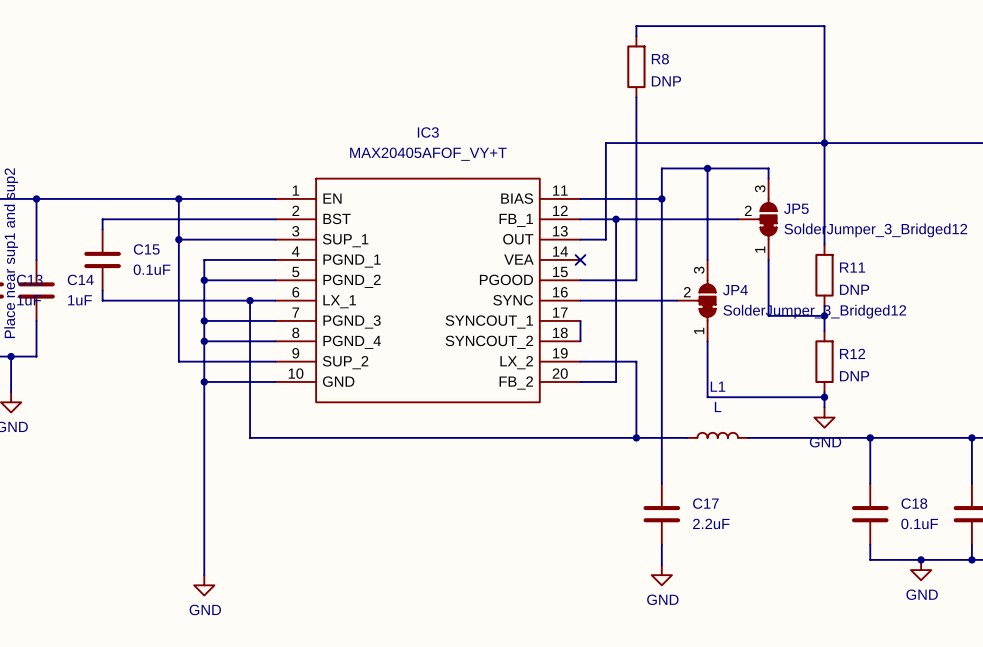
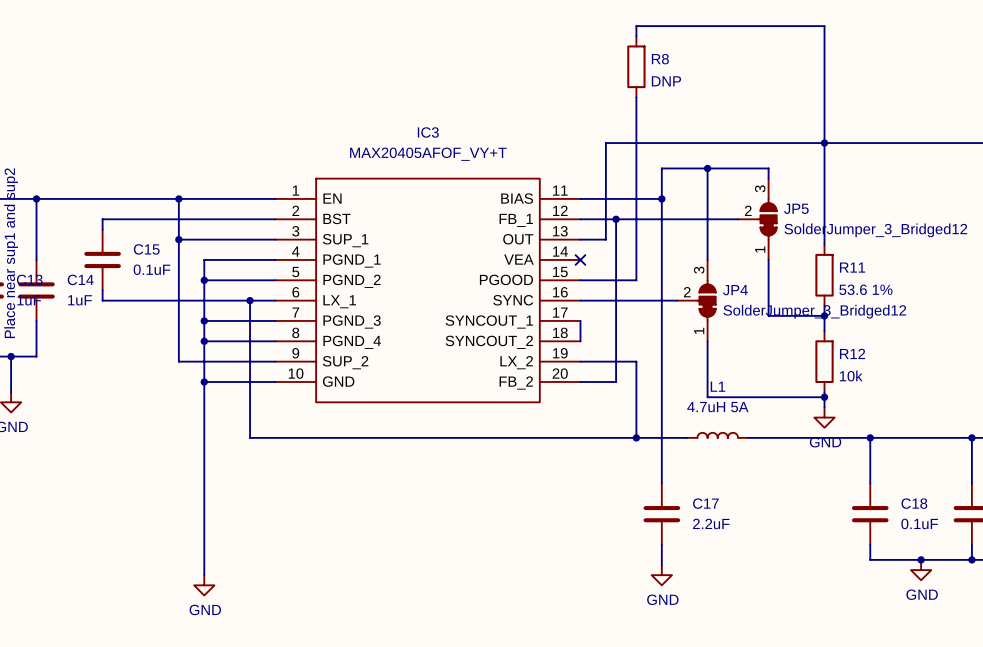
R11 value: DNP (854, 289) -> 53.6 1% (865, 289)
R12 value: DNP (854, 376) -> 10k (851, 376)
L1 value: L (718, 407) -> 4.7uH 5A (717, 407)

